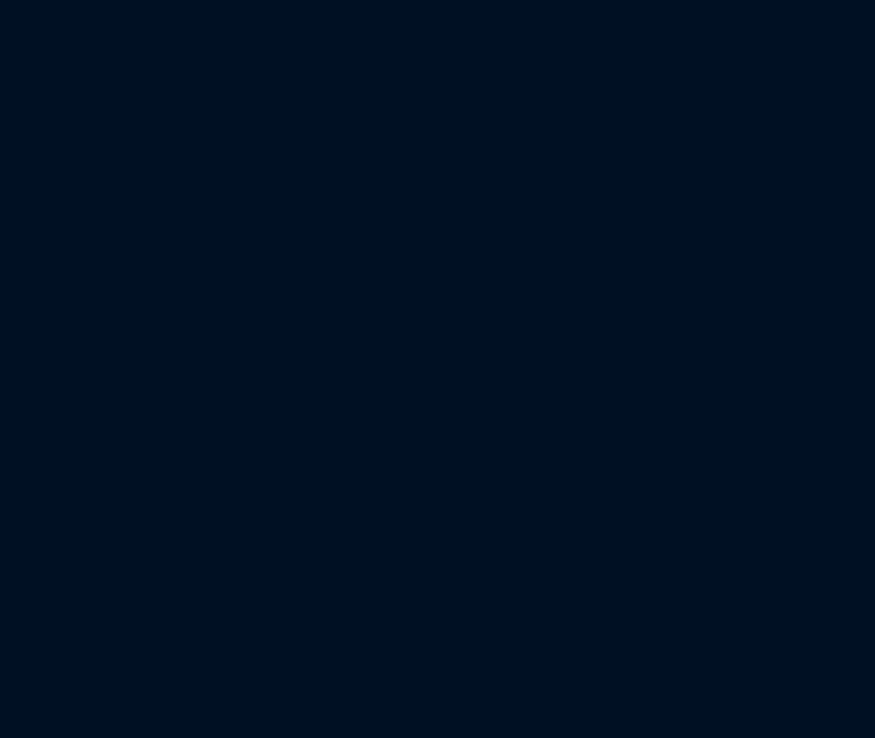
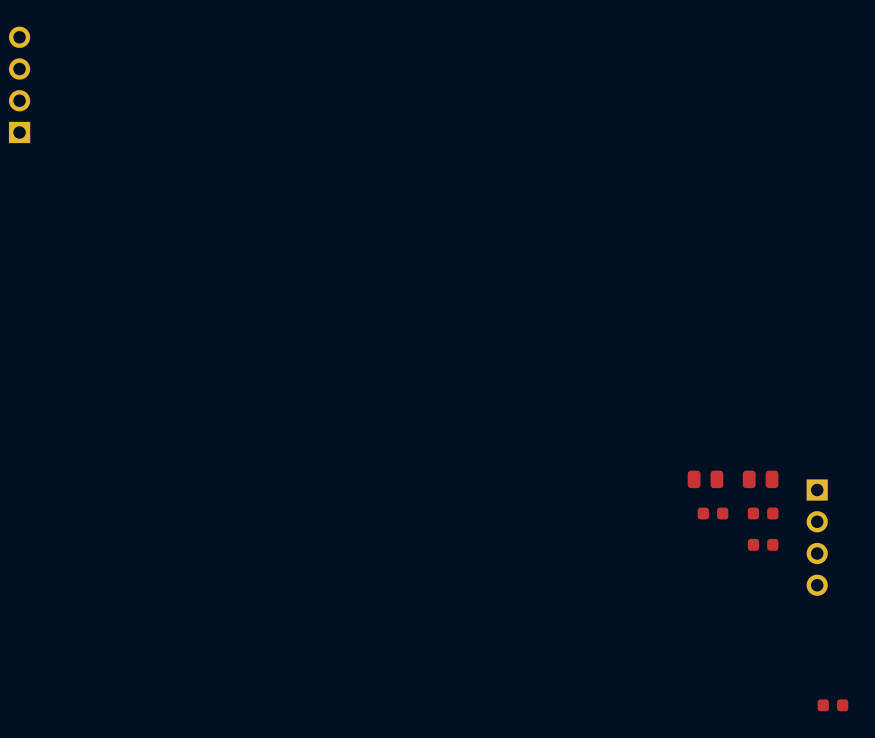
part: none -> (19, 84)
part: none -> (705, 479)
part: none -> (760, 479)
part: none -> (713, 513)
part: none -> (763, 513)
part: none -> (817, 537)
part: none -> (763, 544)
part: none -> (832, 705)

